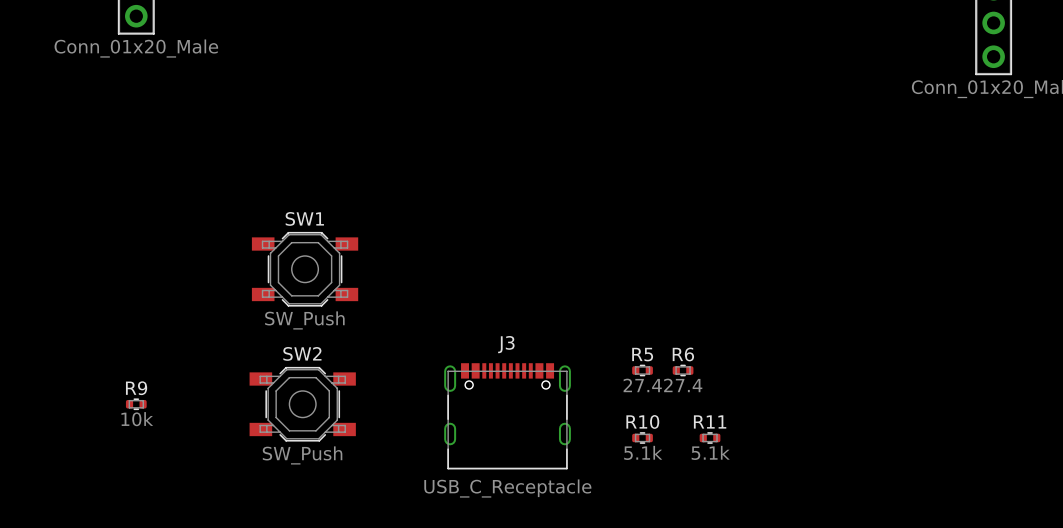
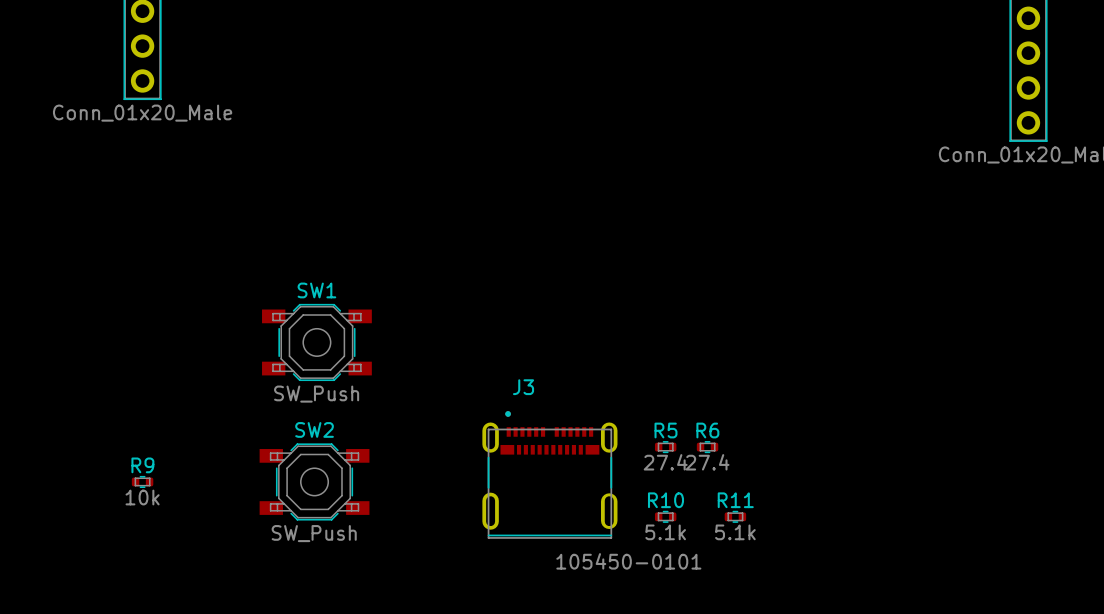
J3 name position: J3 (506, 344) -> J3 (523, 387)
J3 footprint: [444, 363, 571, 470] -> [482, 411, 618, 539]
J3 value: USB_C_Receptacle (507, 488) -> 105450-0101 (628, 561)

